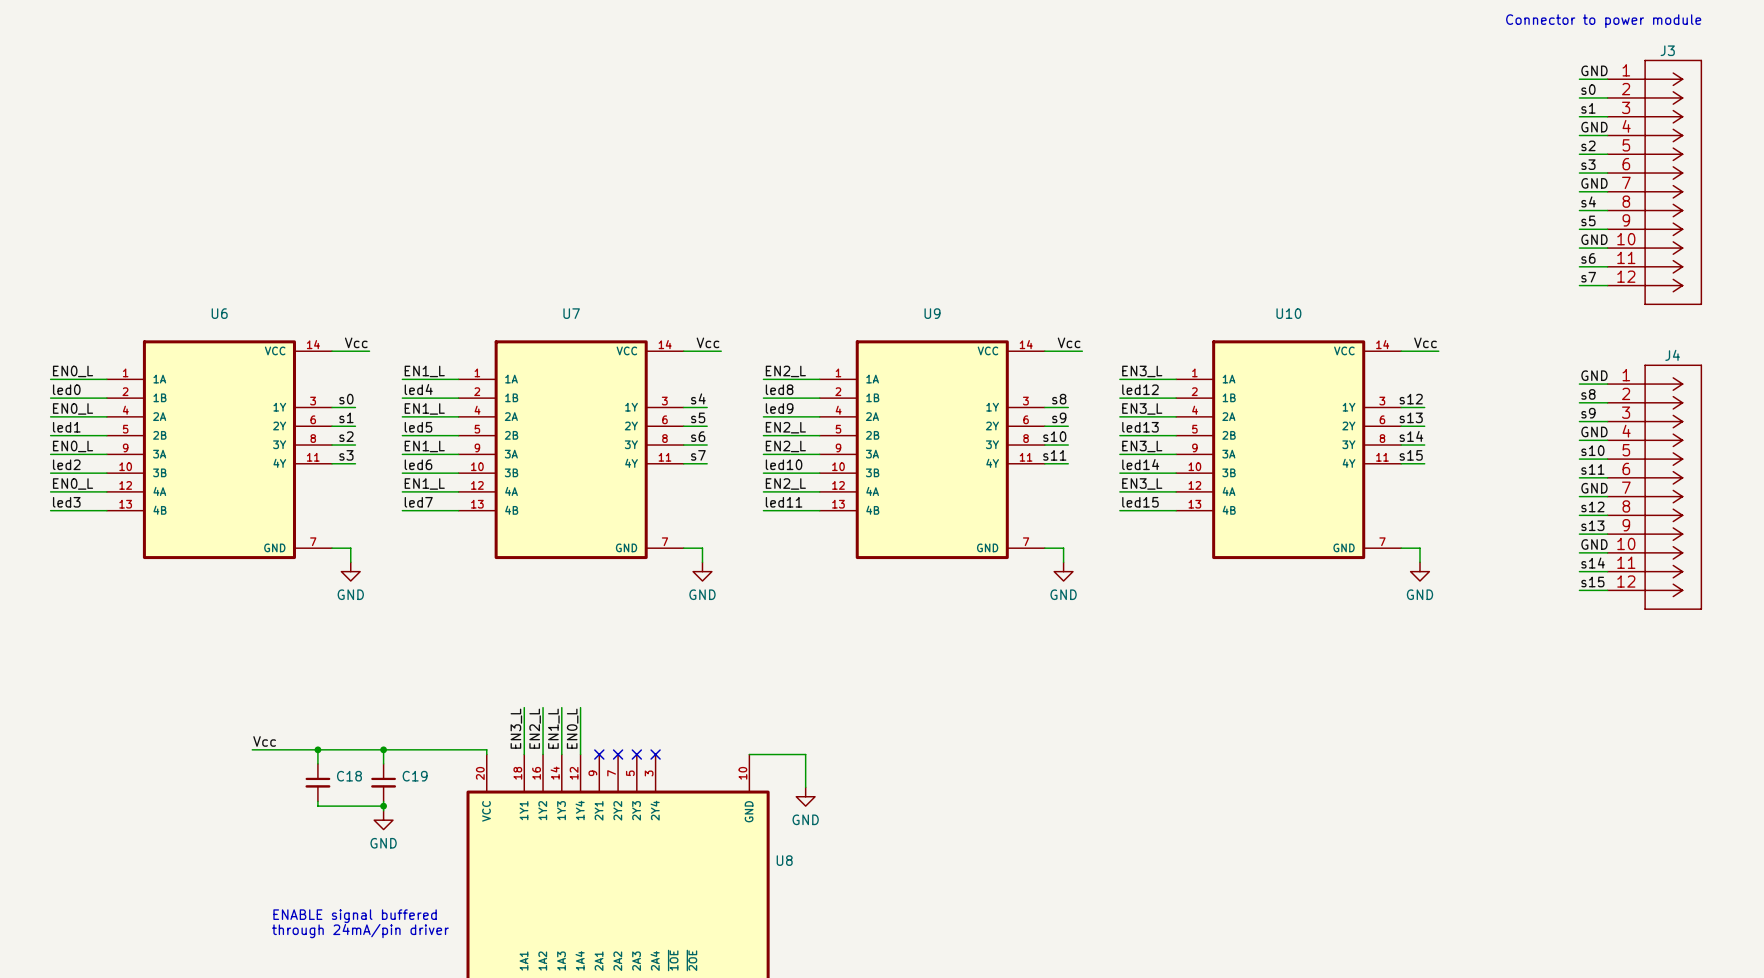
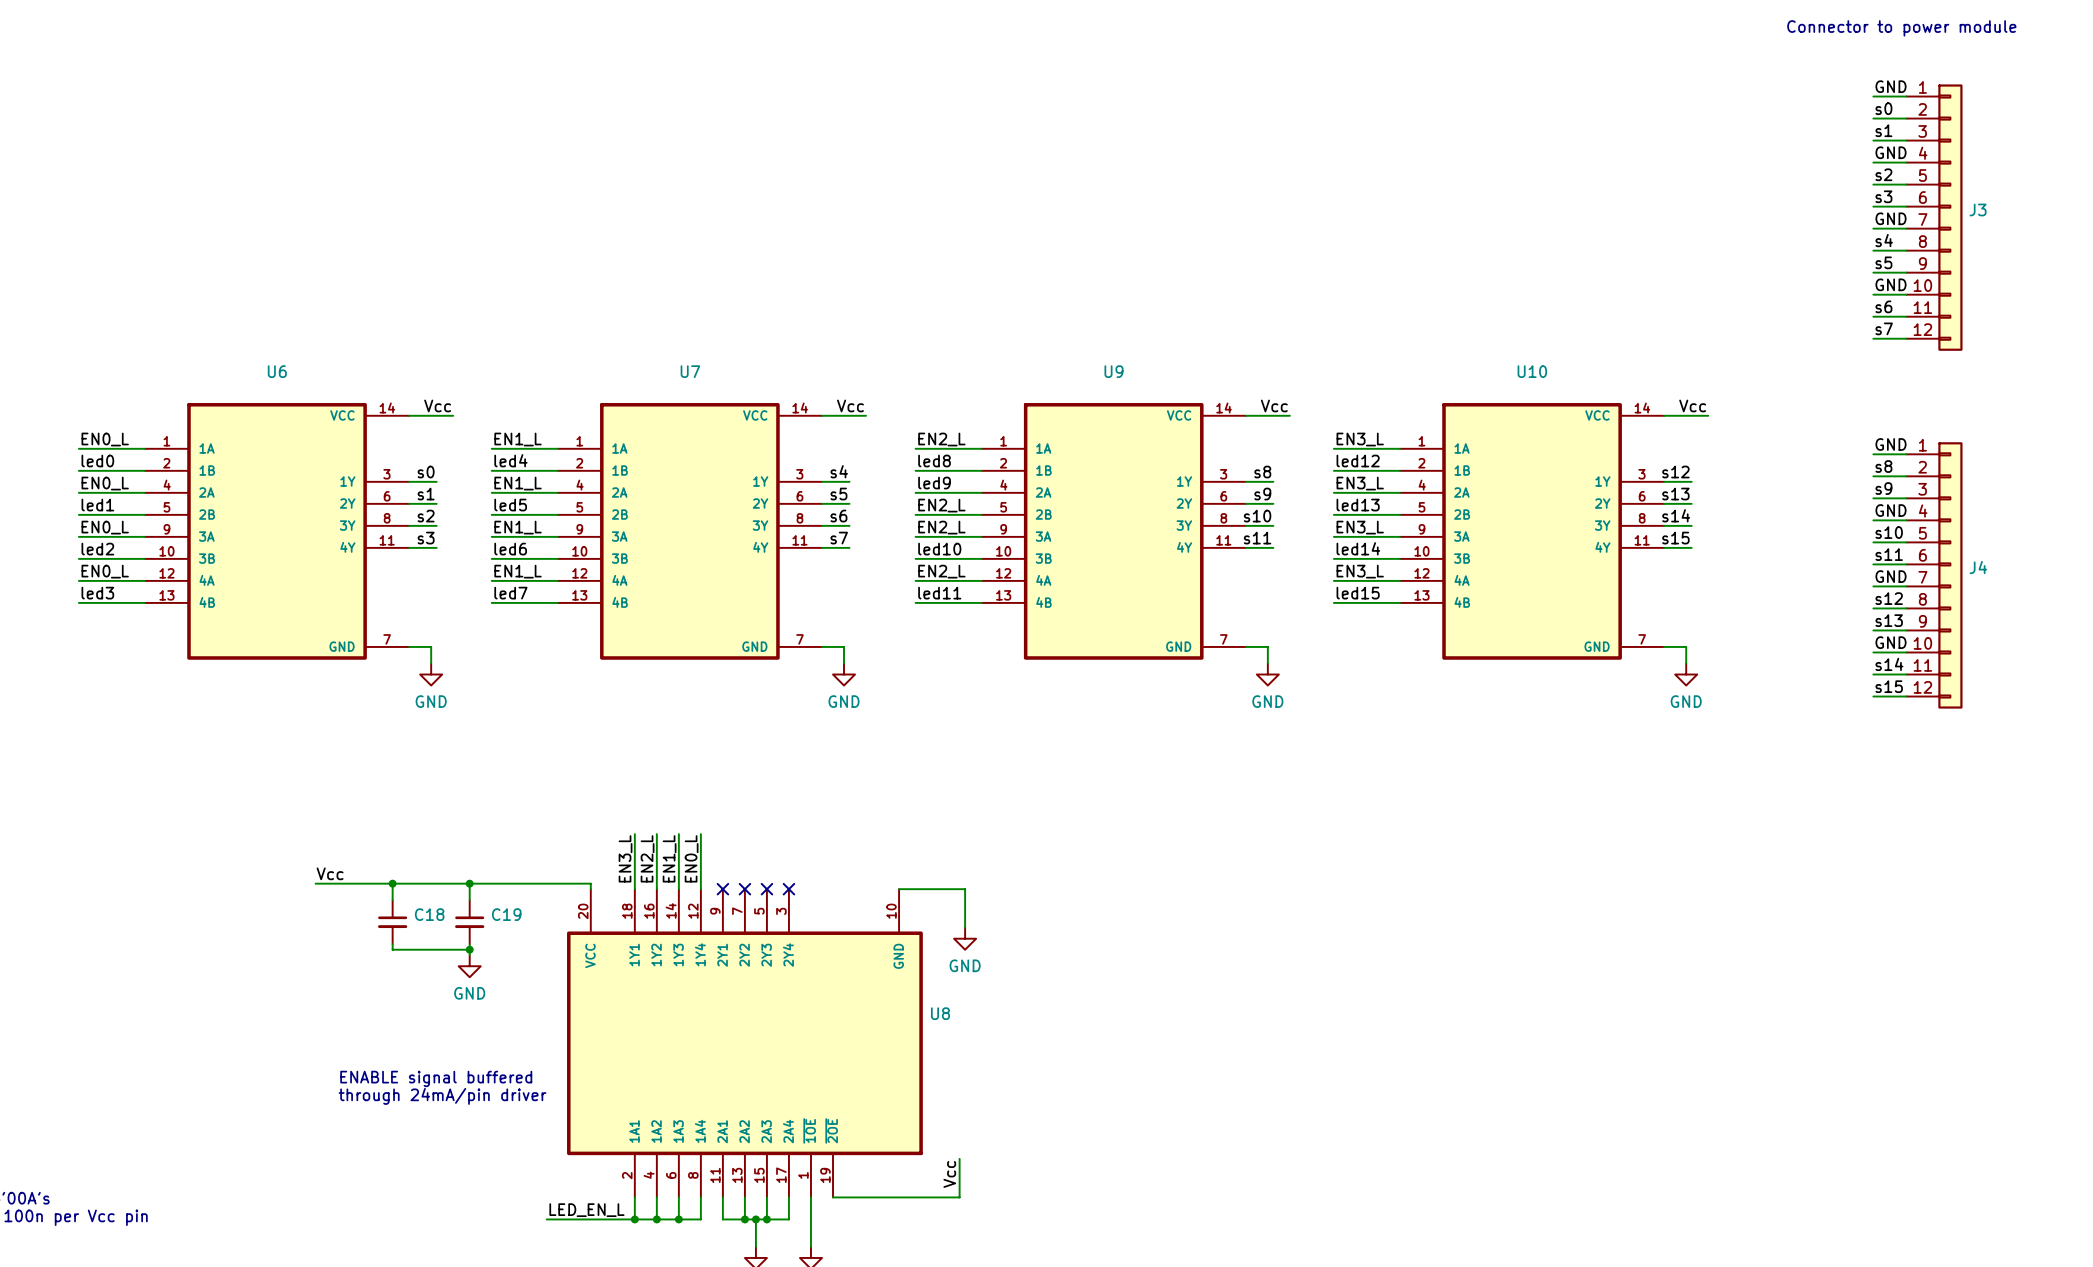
J3 name position: J3 (1667, 50) -> J3 (1978, 209)
J3 symbol: [1607, 59, 1702, 305] -> [1906, 84, 1963, 351]
J4 name position: J4 (1672, 355) -> J4 (1978, 567)
J4 symbol: [1607, 364, 1702, 610] -> [1906, 442, 1963, 709]

